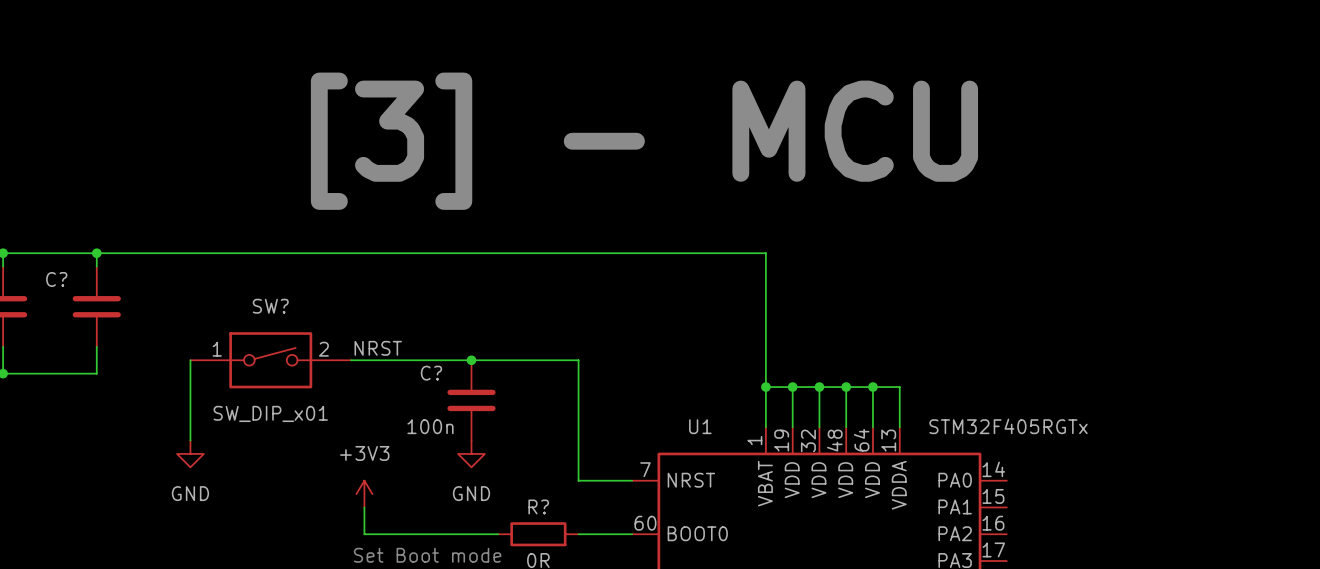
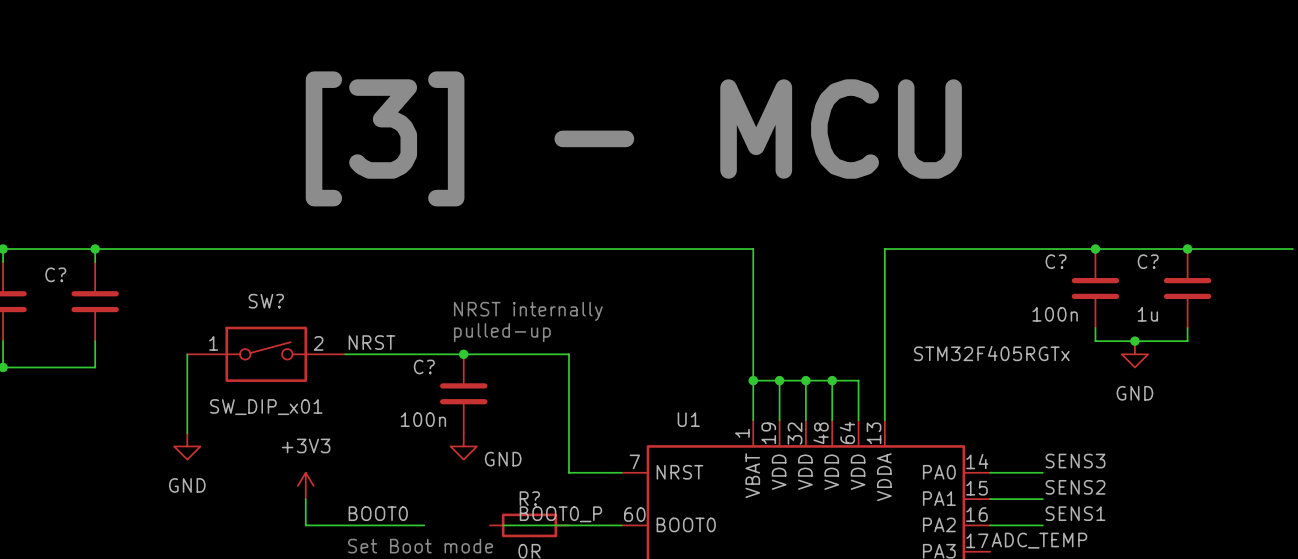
junction: none -> (1095, 249)
junction: none -> (1187, 249)
C?: none -> 100n (1095, 288)
C?: none -> 1u (1187, 288)
text: none -> NRST internally (528, 311)
wire: none -> (1095, 327) (1095, 341) (1187, 341) (1187, 327)
text: none -> pulled-up (502, 332)
junction: none -> (1134, 341)
power symbol: none -> GND (1134, 354)
wire: (872, 387) (899, 387) -> (1292, 249) (884, 249) (884, 380)
junction: (872, 387) -> none
U1 value position: STM32F405RGTx (1008, 426) -> STM32F405RGTx (991, 353)
label: none -> SENS3 (1075, 461)
wire: none -> (990, 472) (1042, 472)
power symbol text position: GND (471, 493) -> GND (503, 459)
power symbol position: +3V3 (364, 494) -> +3V3 (305, 485)
label: none -> SENS2 (1075, 487)
wire: (364, 507) (364, 534) -> (305, 499) (305, 525) (358, 525)
wire: none -> (990, 499) (1042, 499)
label: none -> BOOT0 (378, 513)
label: none -> BOOT0_P (560, 514)
label: none -> SENS1 (1075, 513)
wire: (431, 534) (498, 534) -> (503, 525) (568, 525)
wire: none -> (990, 525) (1042, 525)
label: none -> ADC_TEMP (1039, 540)

